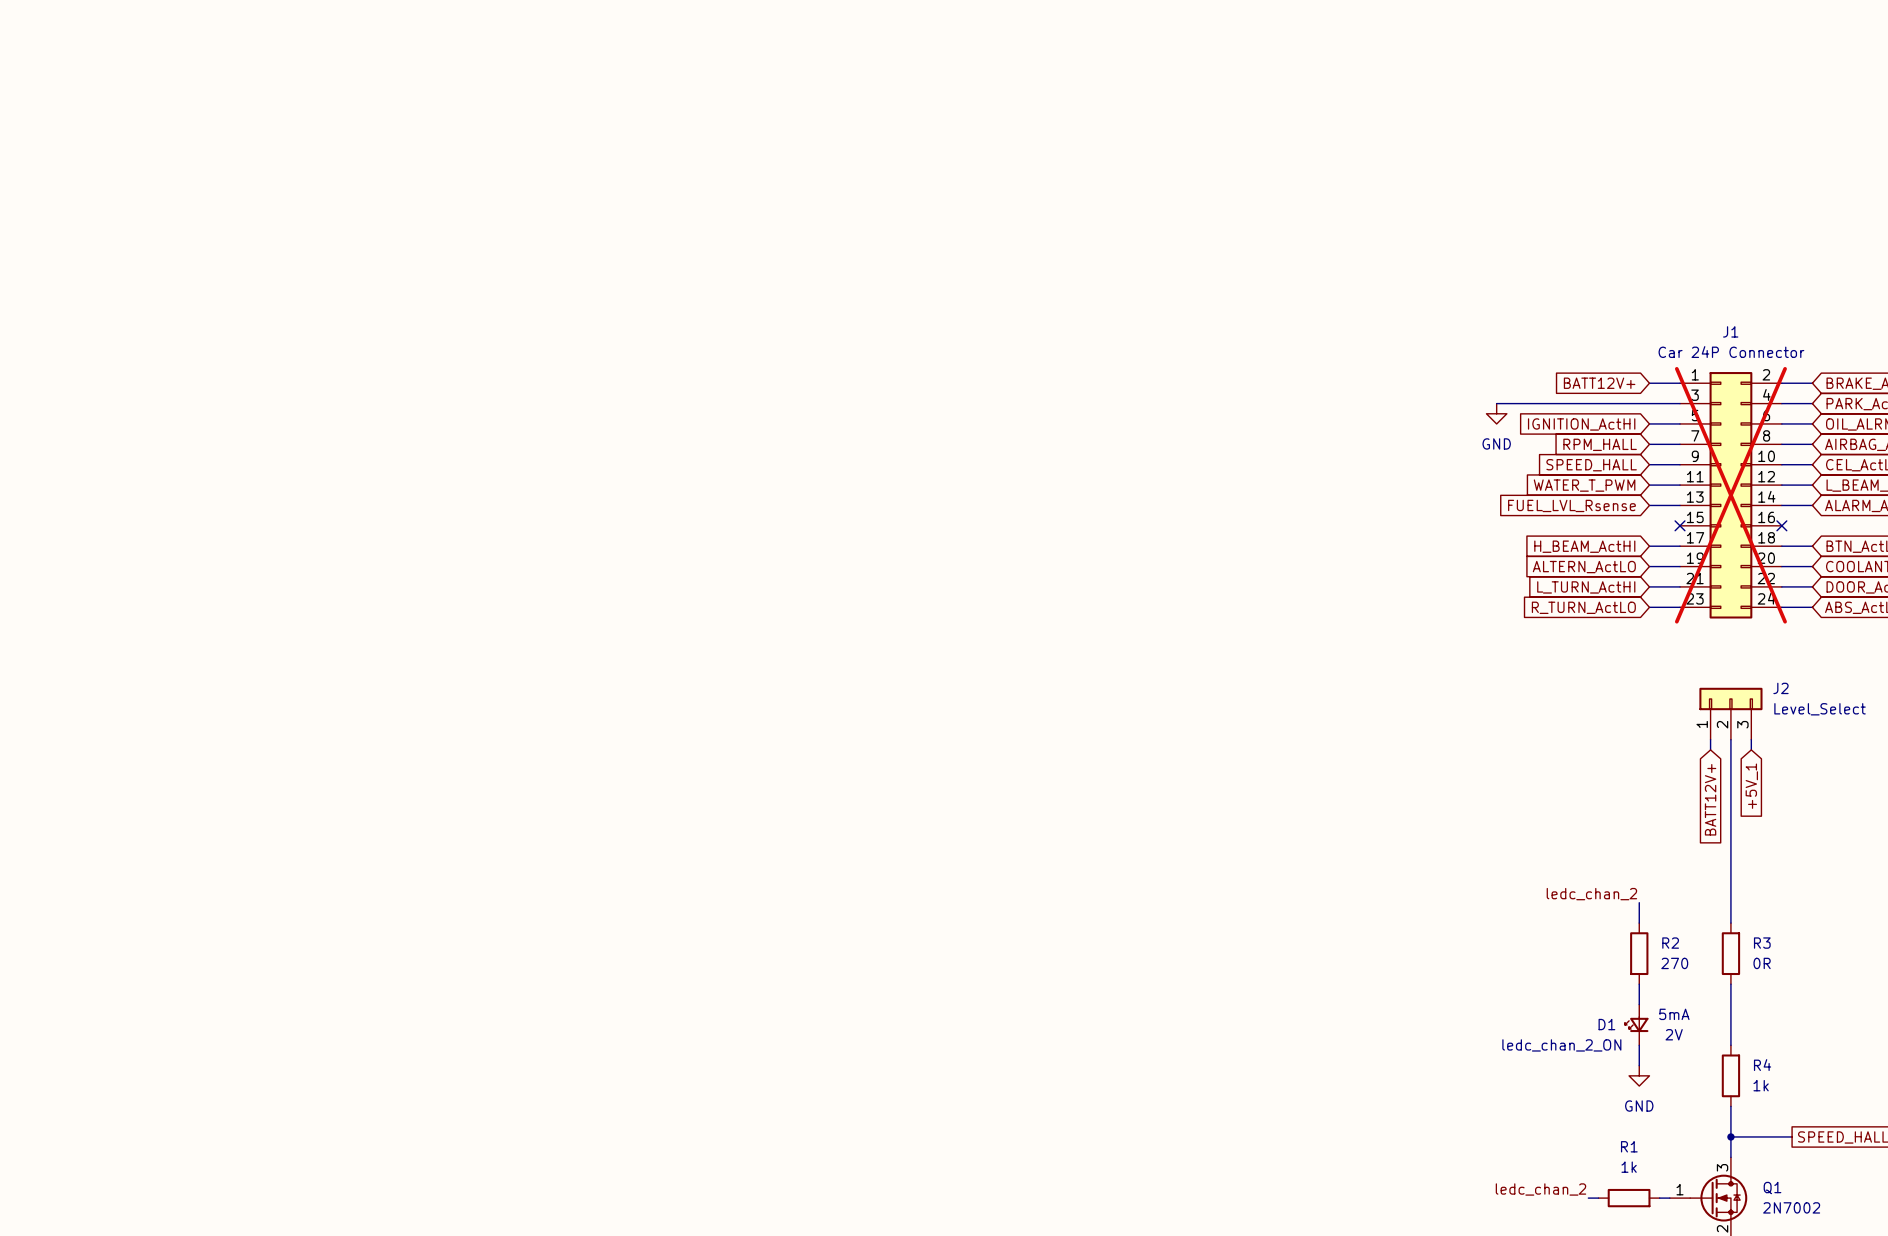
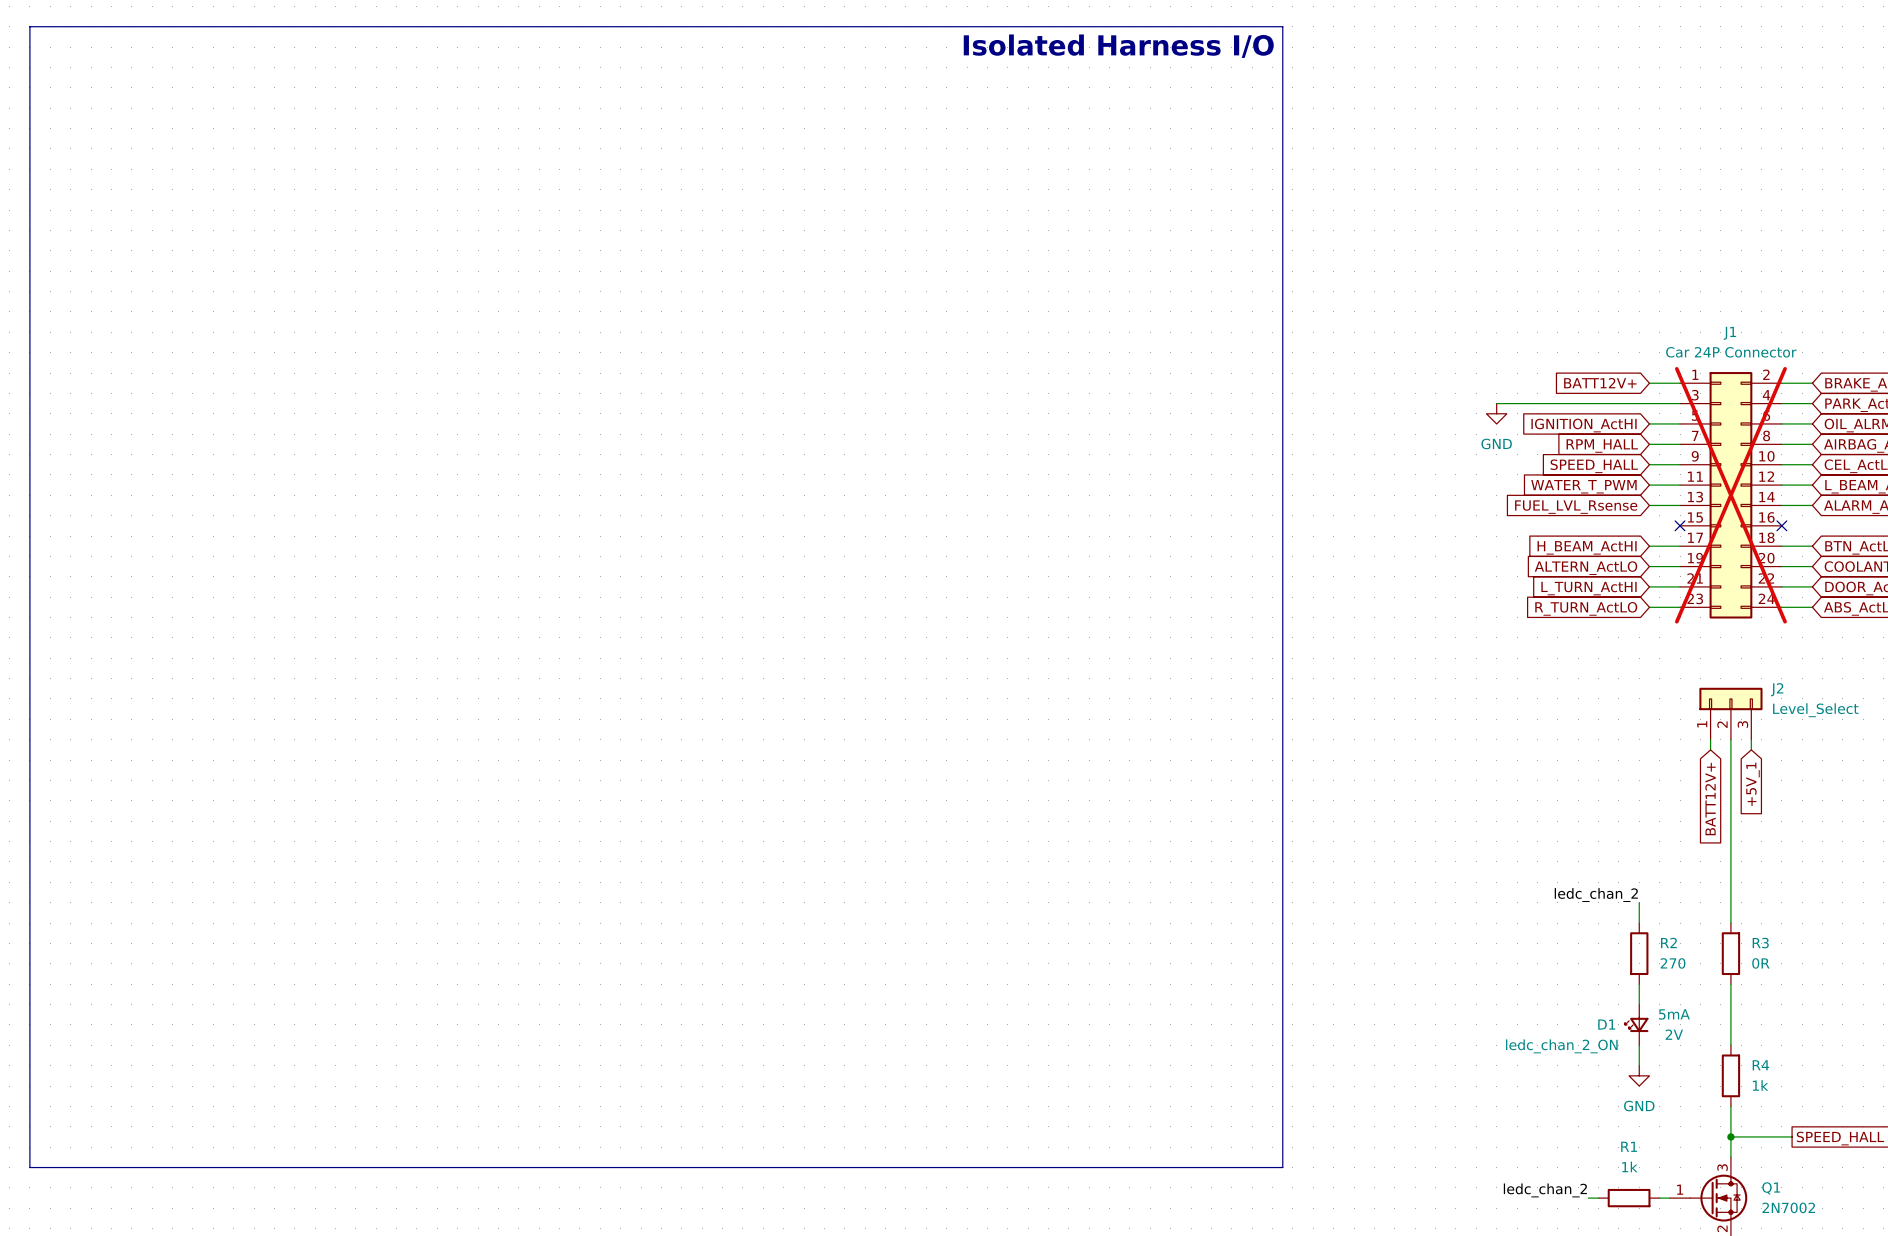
line: none -> (29, 26) (1282, 26) (1282, 1167) (29, 1167) (29, 26)
text: none -> Isolated Harness I/O (1118, 46)

